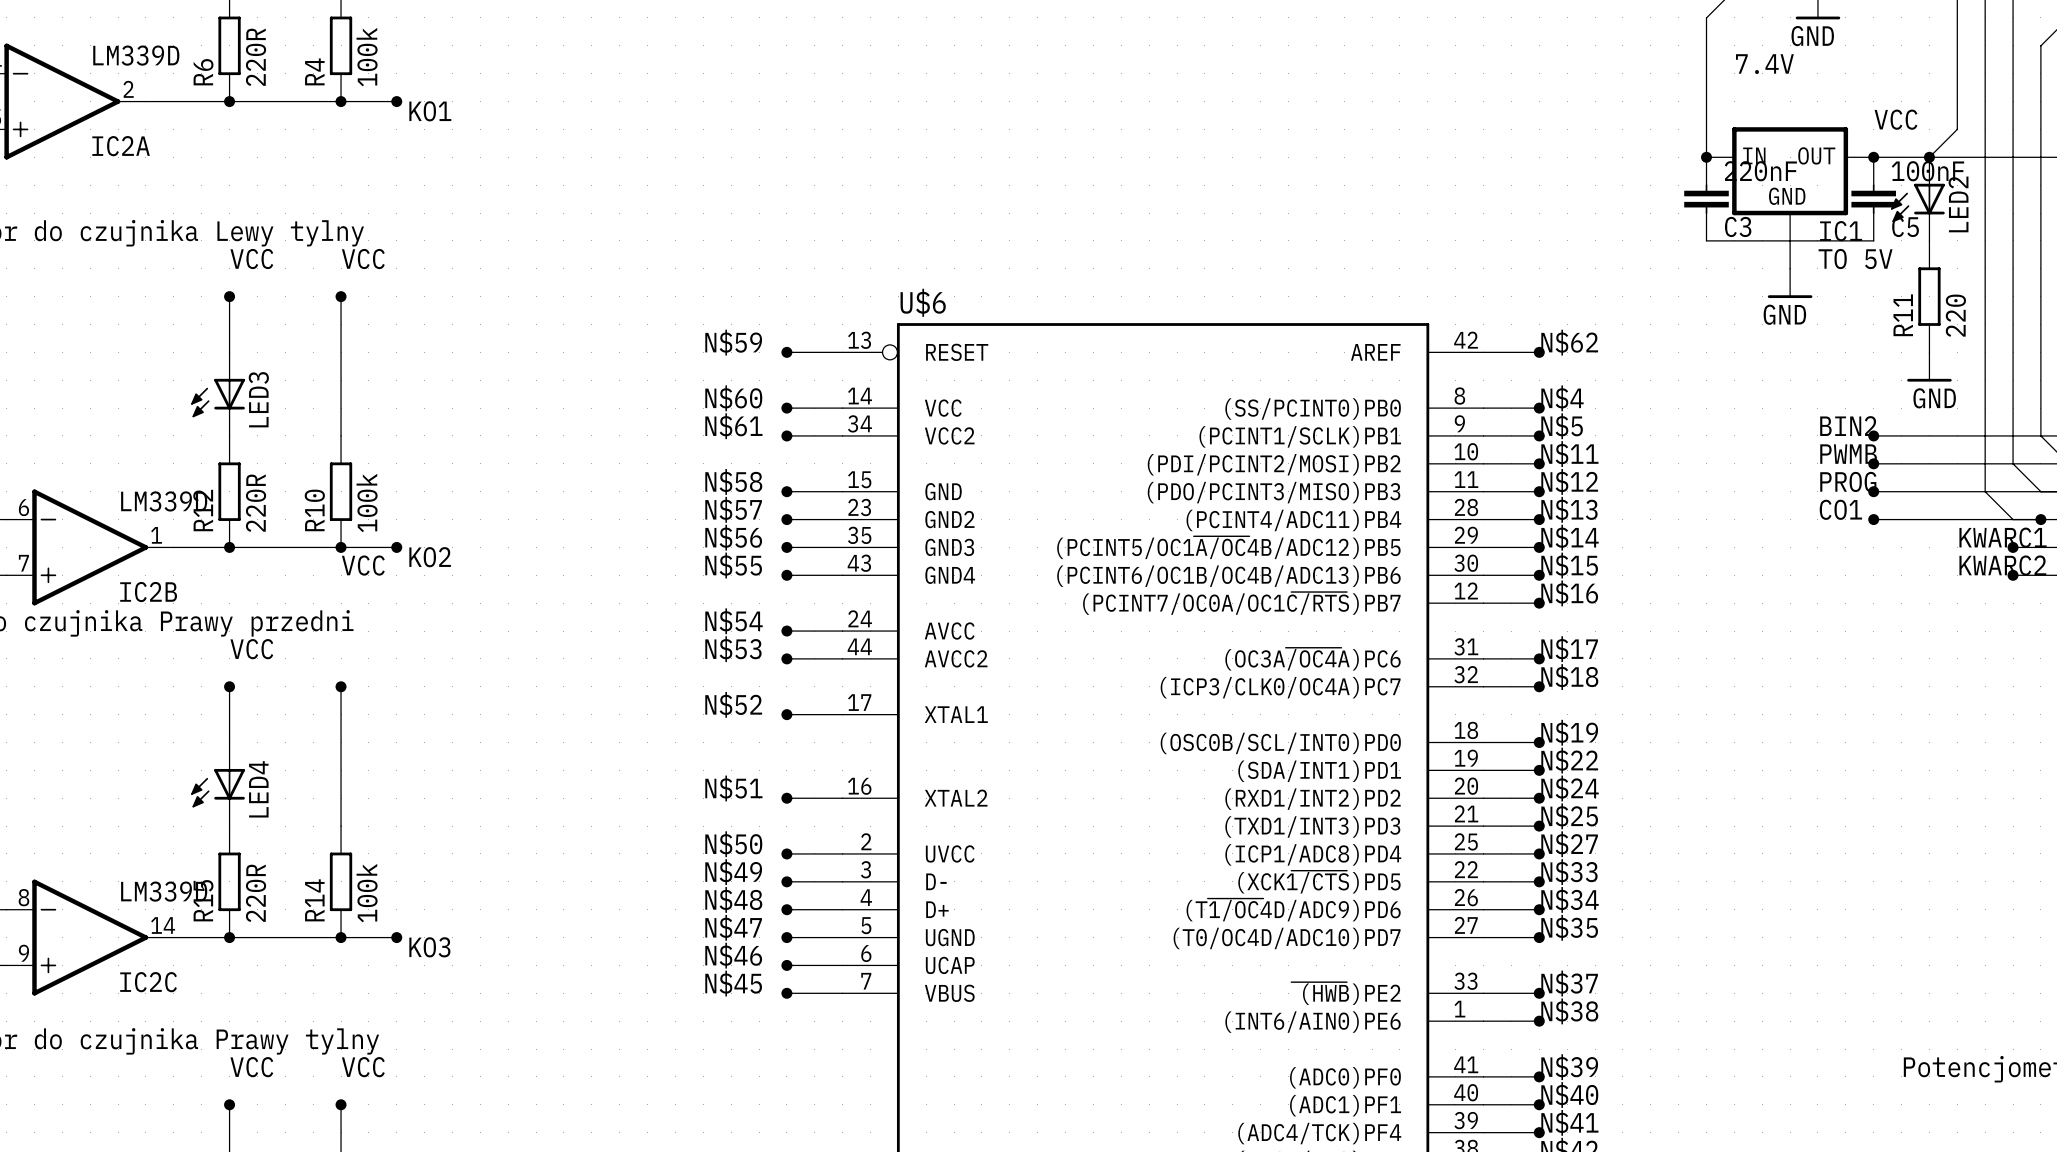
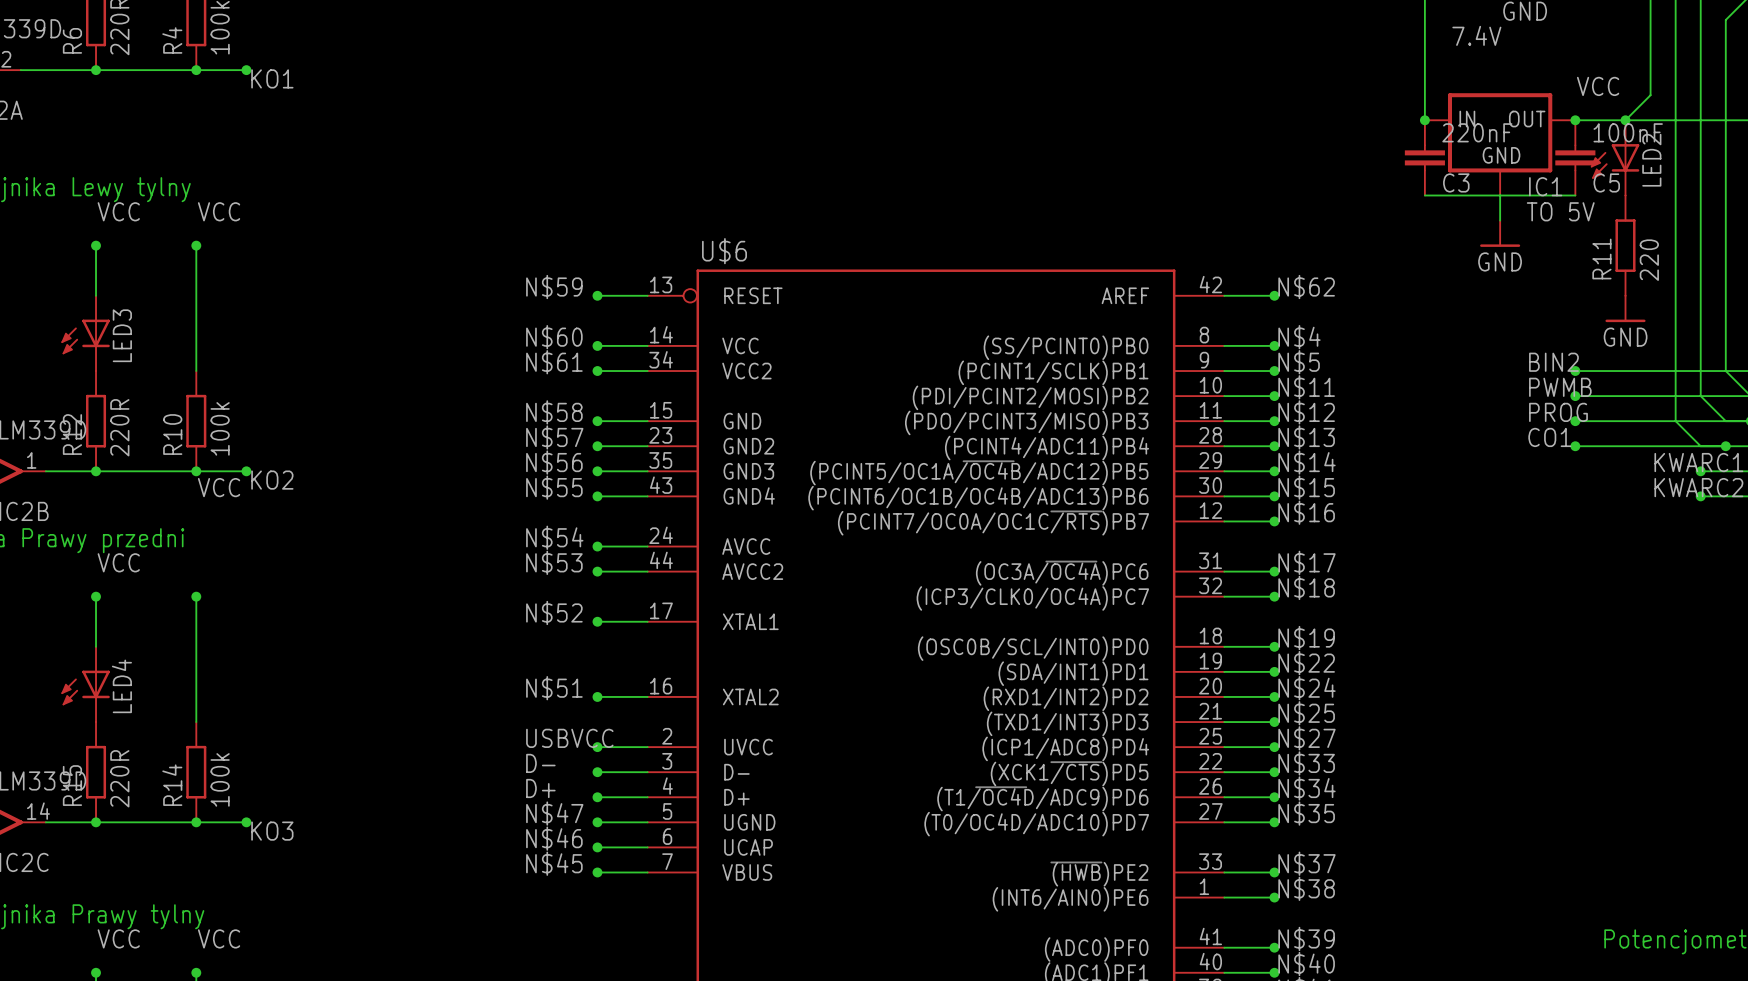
label: N$50 (733, 844) -> USBVCC (569, 738)
label: N$49 (733, 872) -> D- (540, 763)
label: N$48 (733, 899) -> D+ (540, 788)

